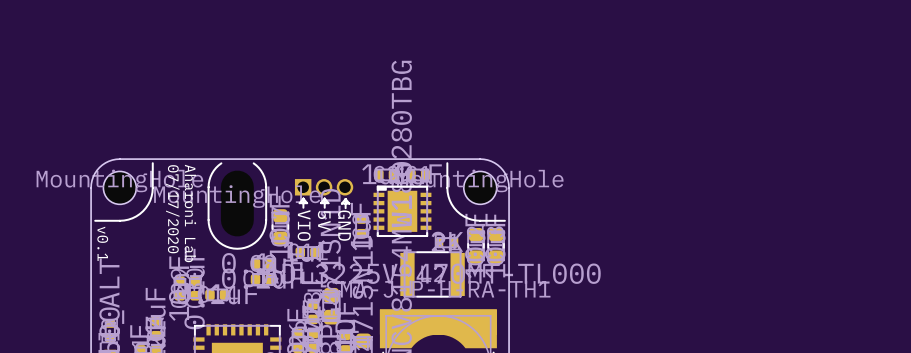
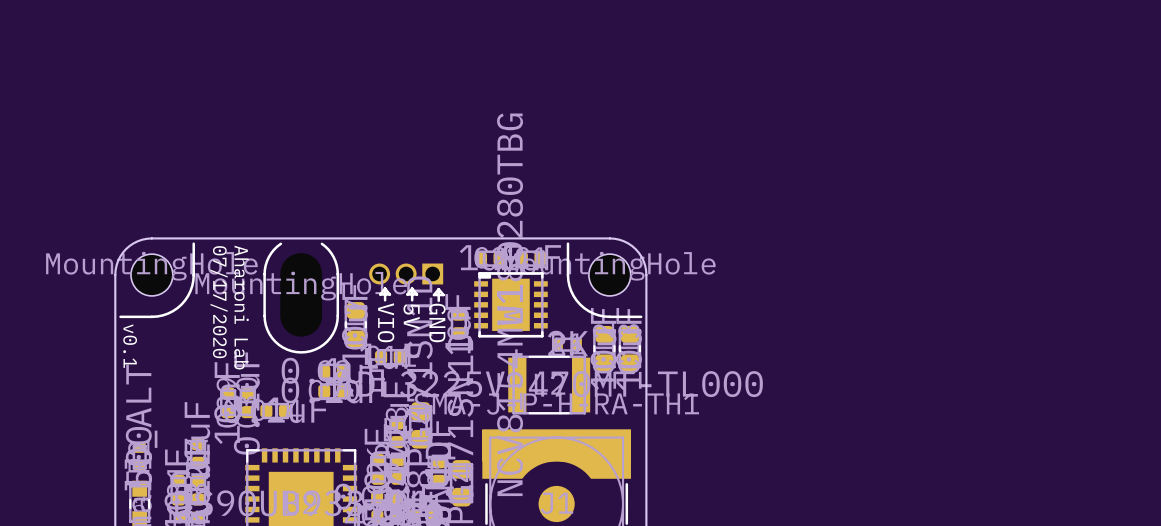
part rotation: 0° (324, 187) -> 180° (406, 273)

